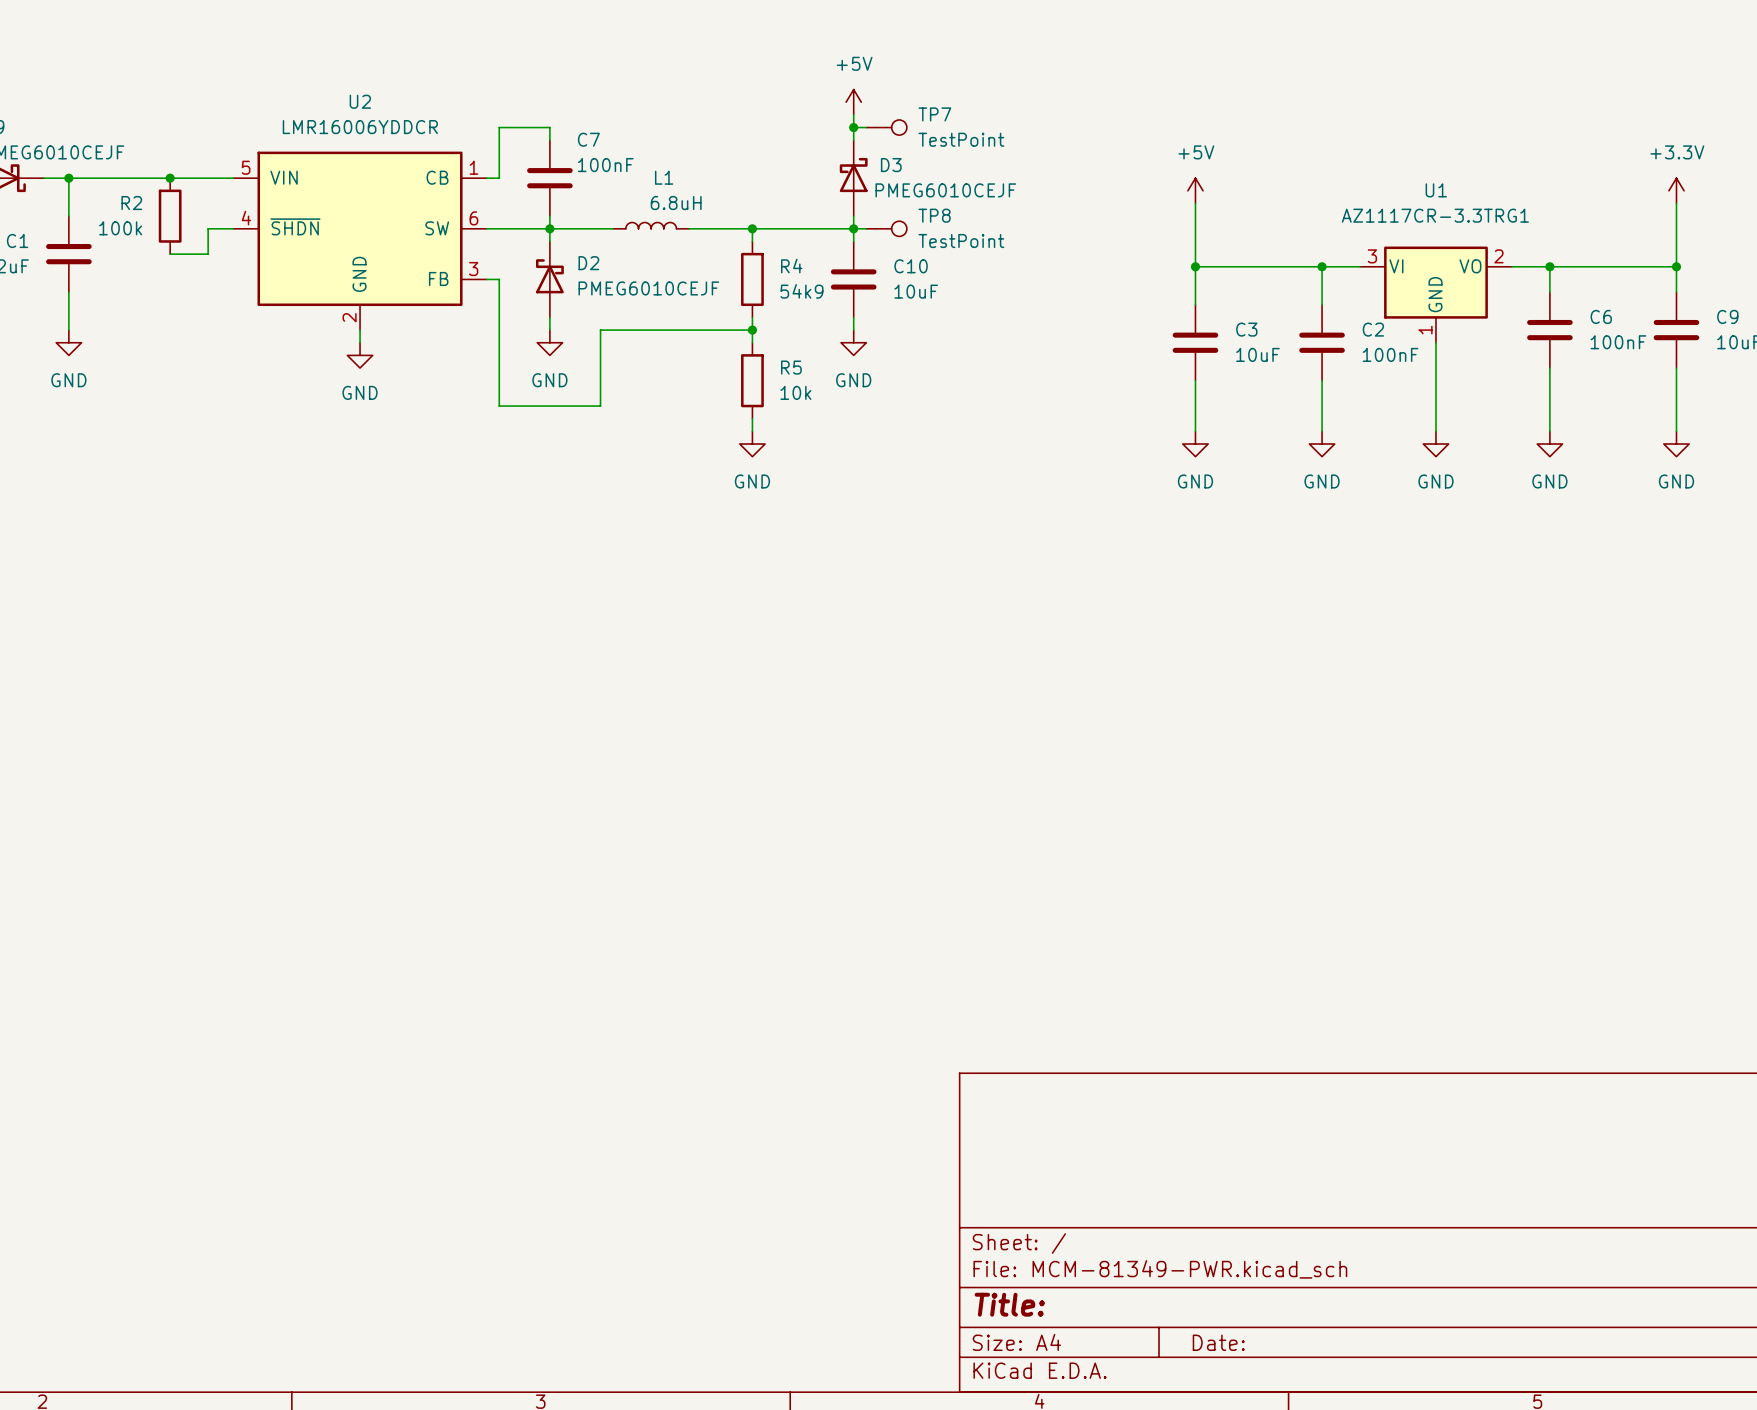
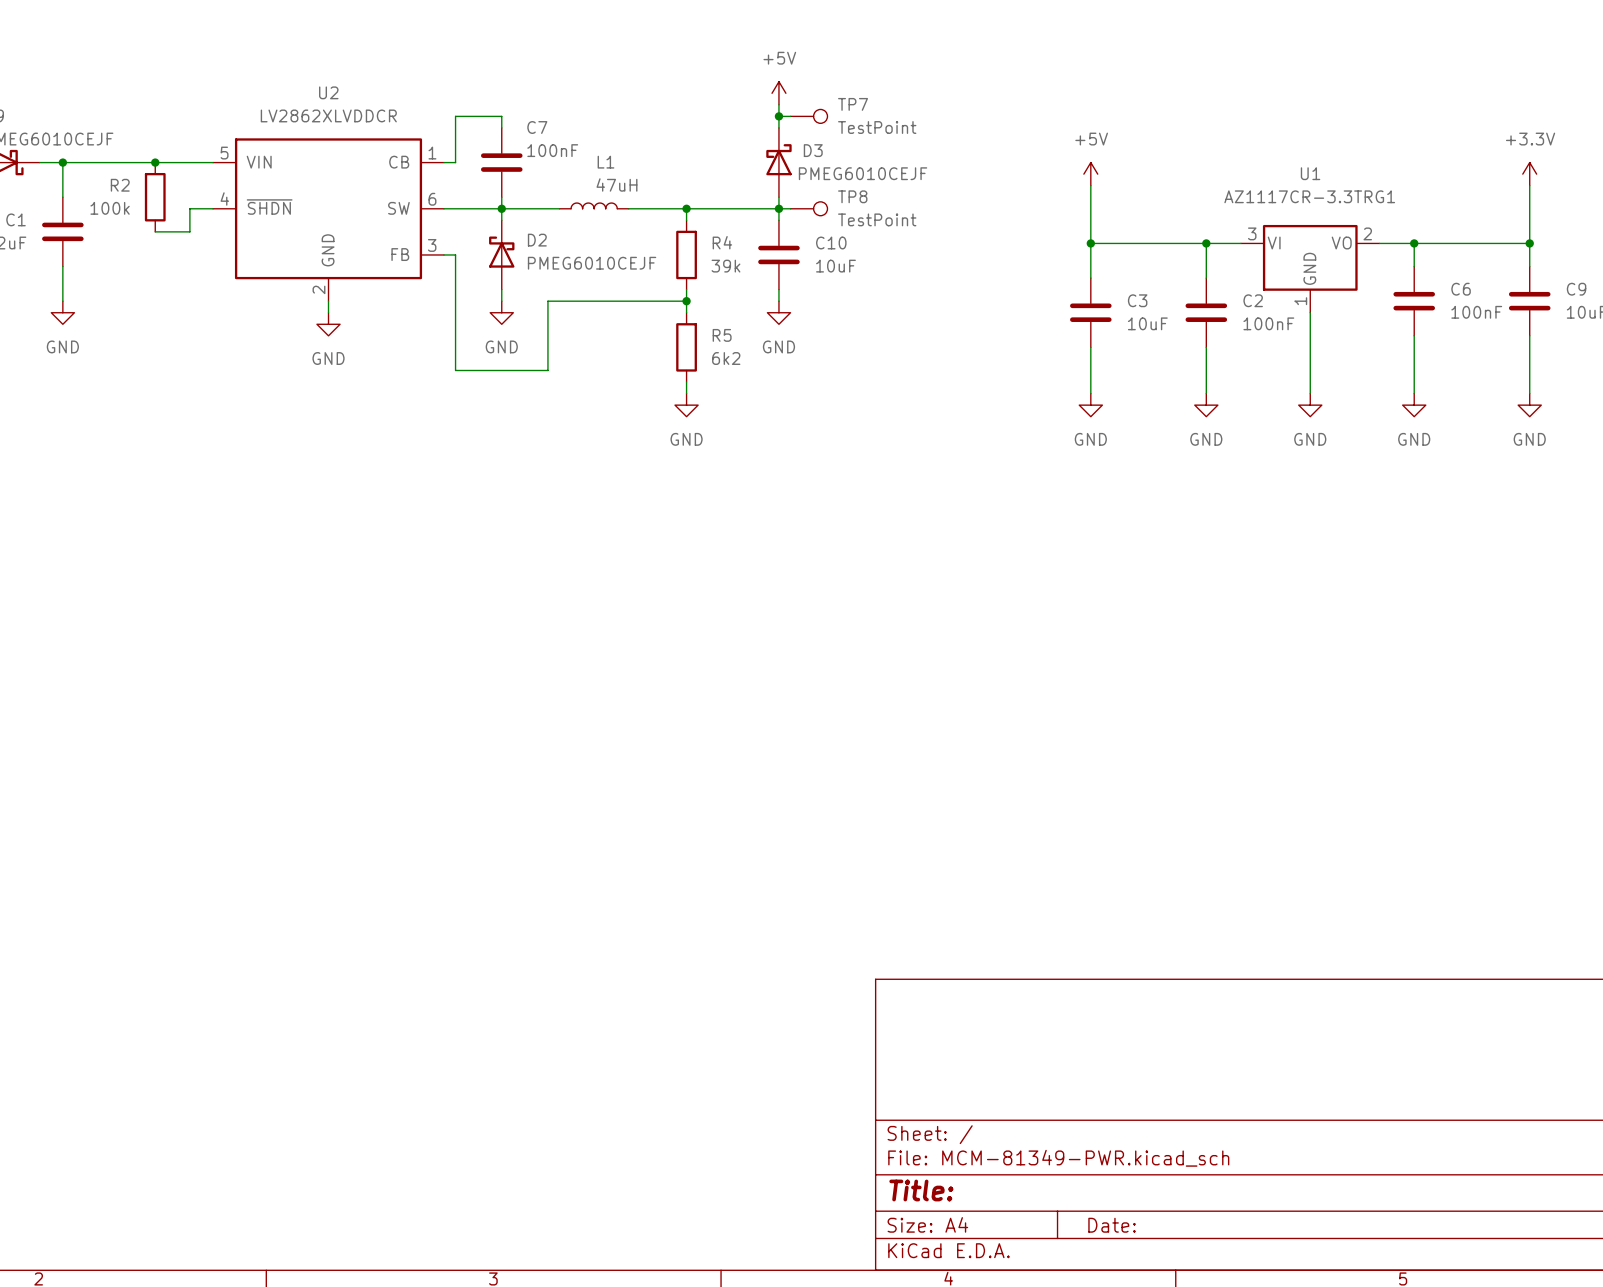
U2 value: LMR16006YDDCR (360, 127) -> LV2862XLVDDCR (328, 115)
L1 value: 6.8uH (676, 203) -> 47uH (616, 184)
R4 value: 54k9 (801, 291) -> 39k (725, 266)
R5 value: 10k (795, 392) -> 6k2 (726, 358)

